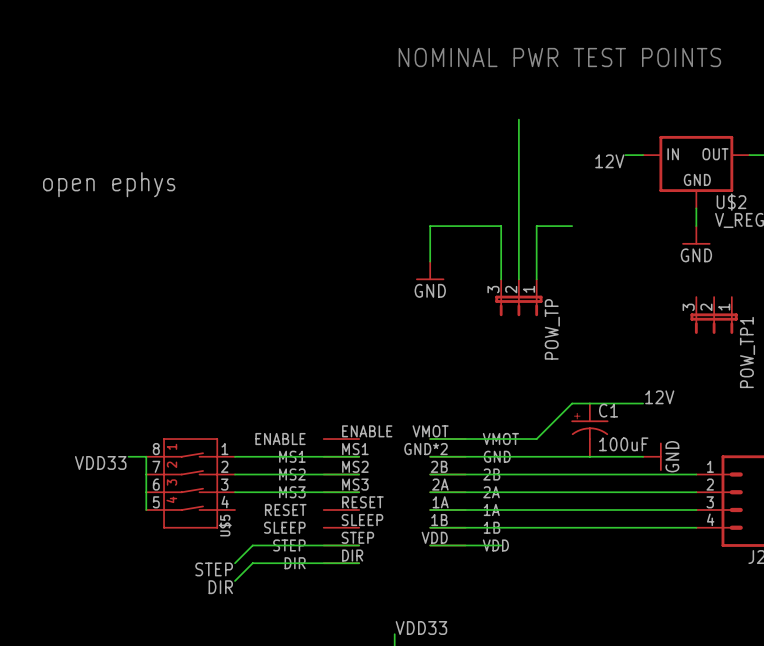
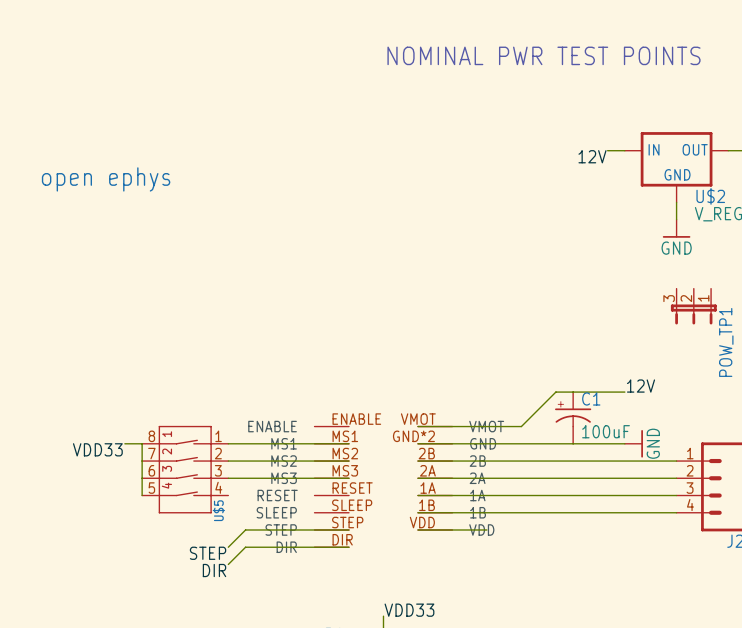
wire: (518, 119) (518, 279) -> none
wire: (572, 226) (536, 226) (536, 279) -> none
wire: (430, 261) (430, 226) (501, 226) (501, 279) -> none
power symbol: GND (430, 270) -> none
POW_TP: (518, 297) -> none

